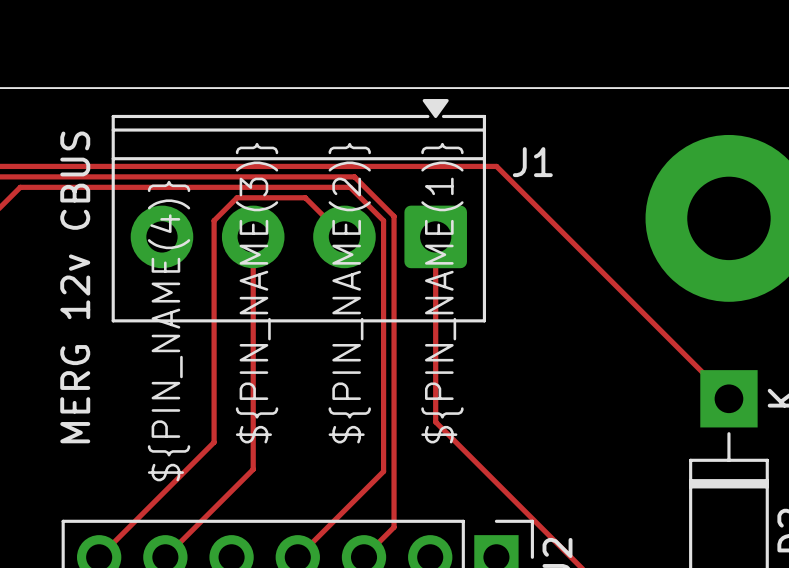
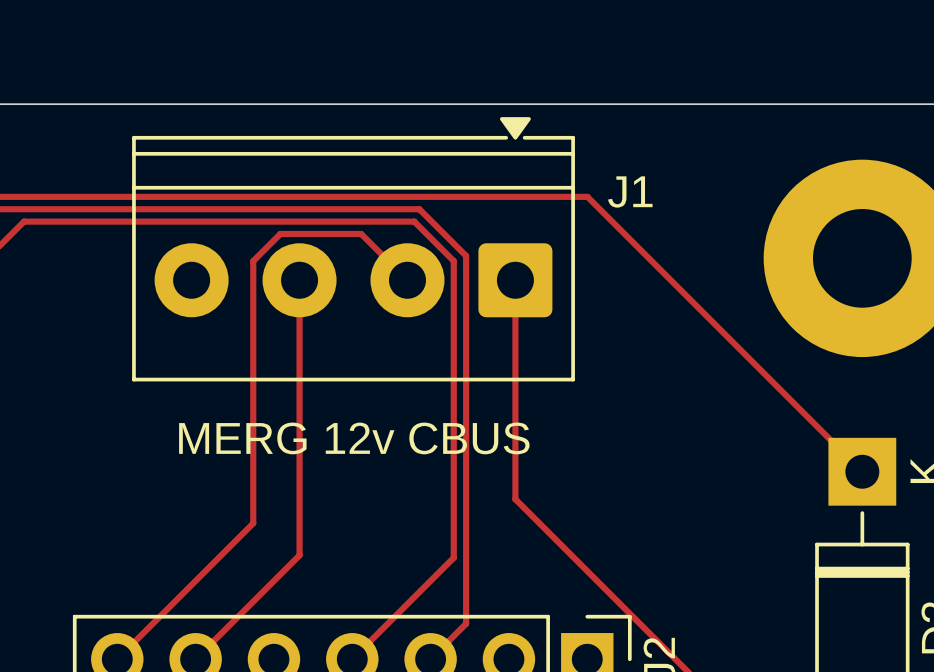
J1 value rotation: 0° (75, 287) -> 90° clockwise (354, 438)
J1 text: ${PIN_NAME(3)} (257, 293) -> none
J1 text: ${PIN_NAME(2)} (349, 293) -> none
J1 text: ${PIN_NAME(1)} (442, 293) -> none
J1 text: ${PIN_NAME(4)} (169, 331) -> none

